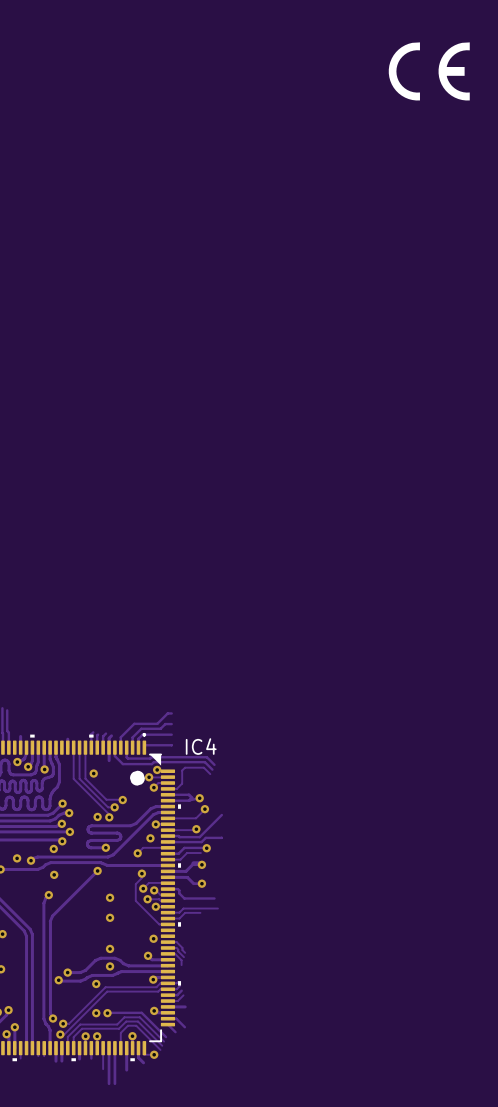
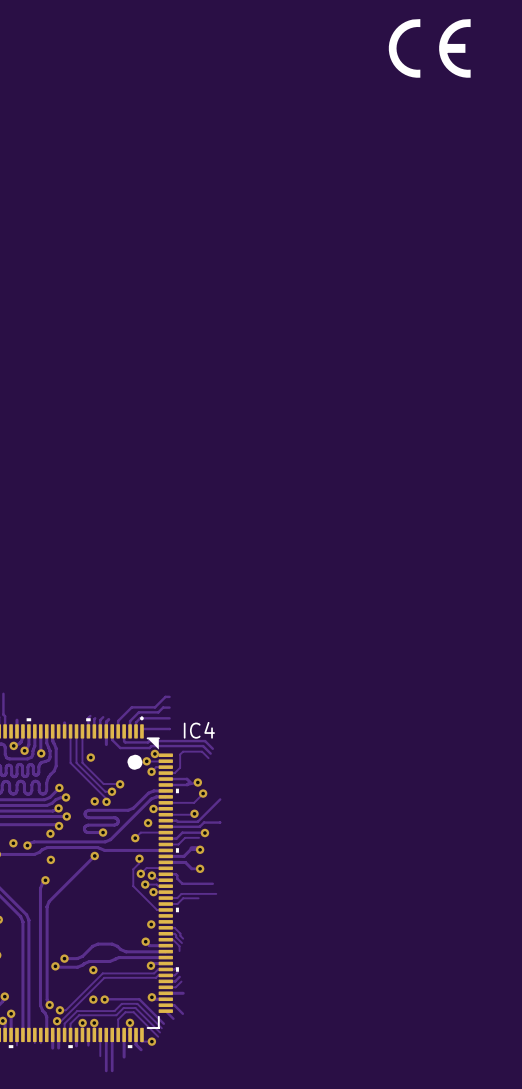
via: (110, 897) -> none
via: (110, 917) -> none
via: (110, 948) -> none
via: (110, 966) -> none

